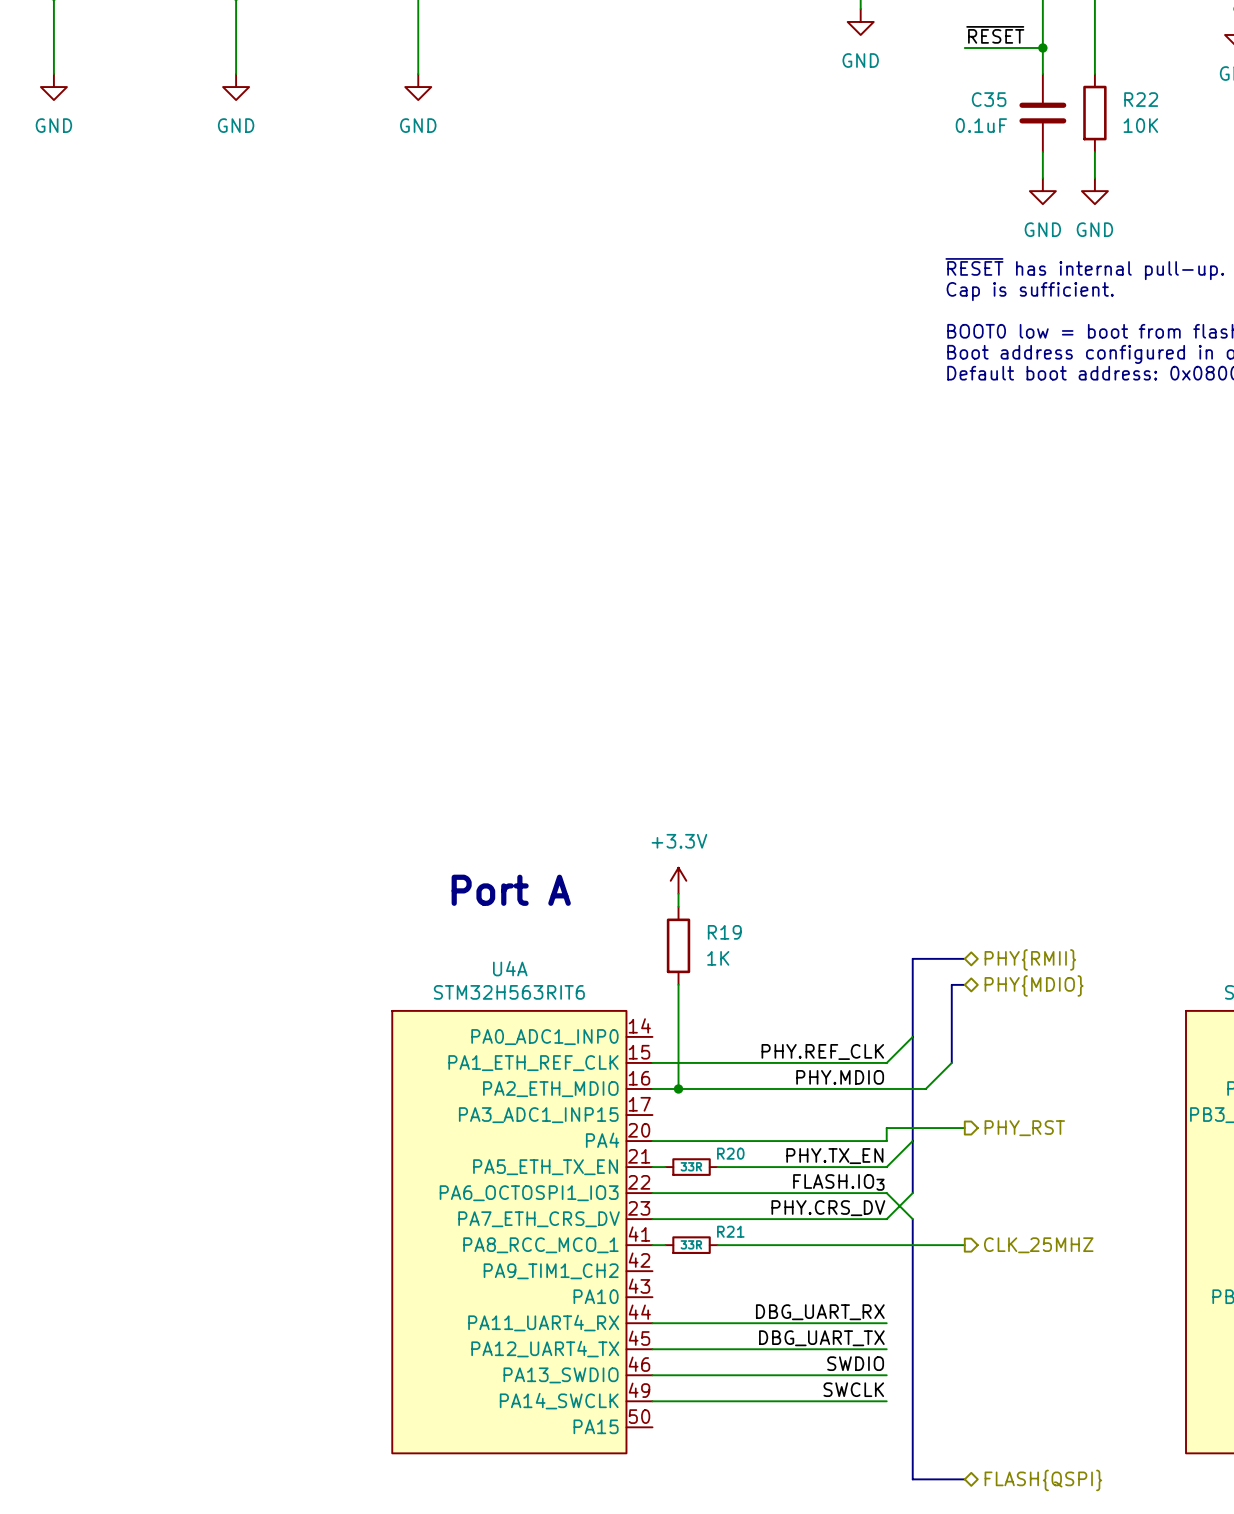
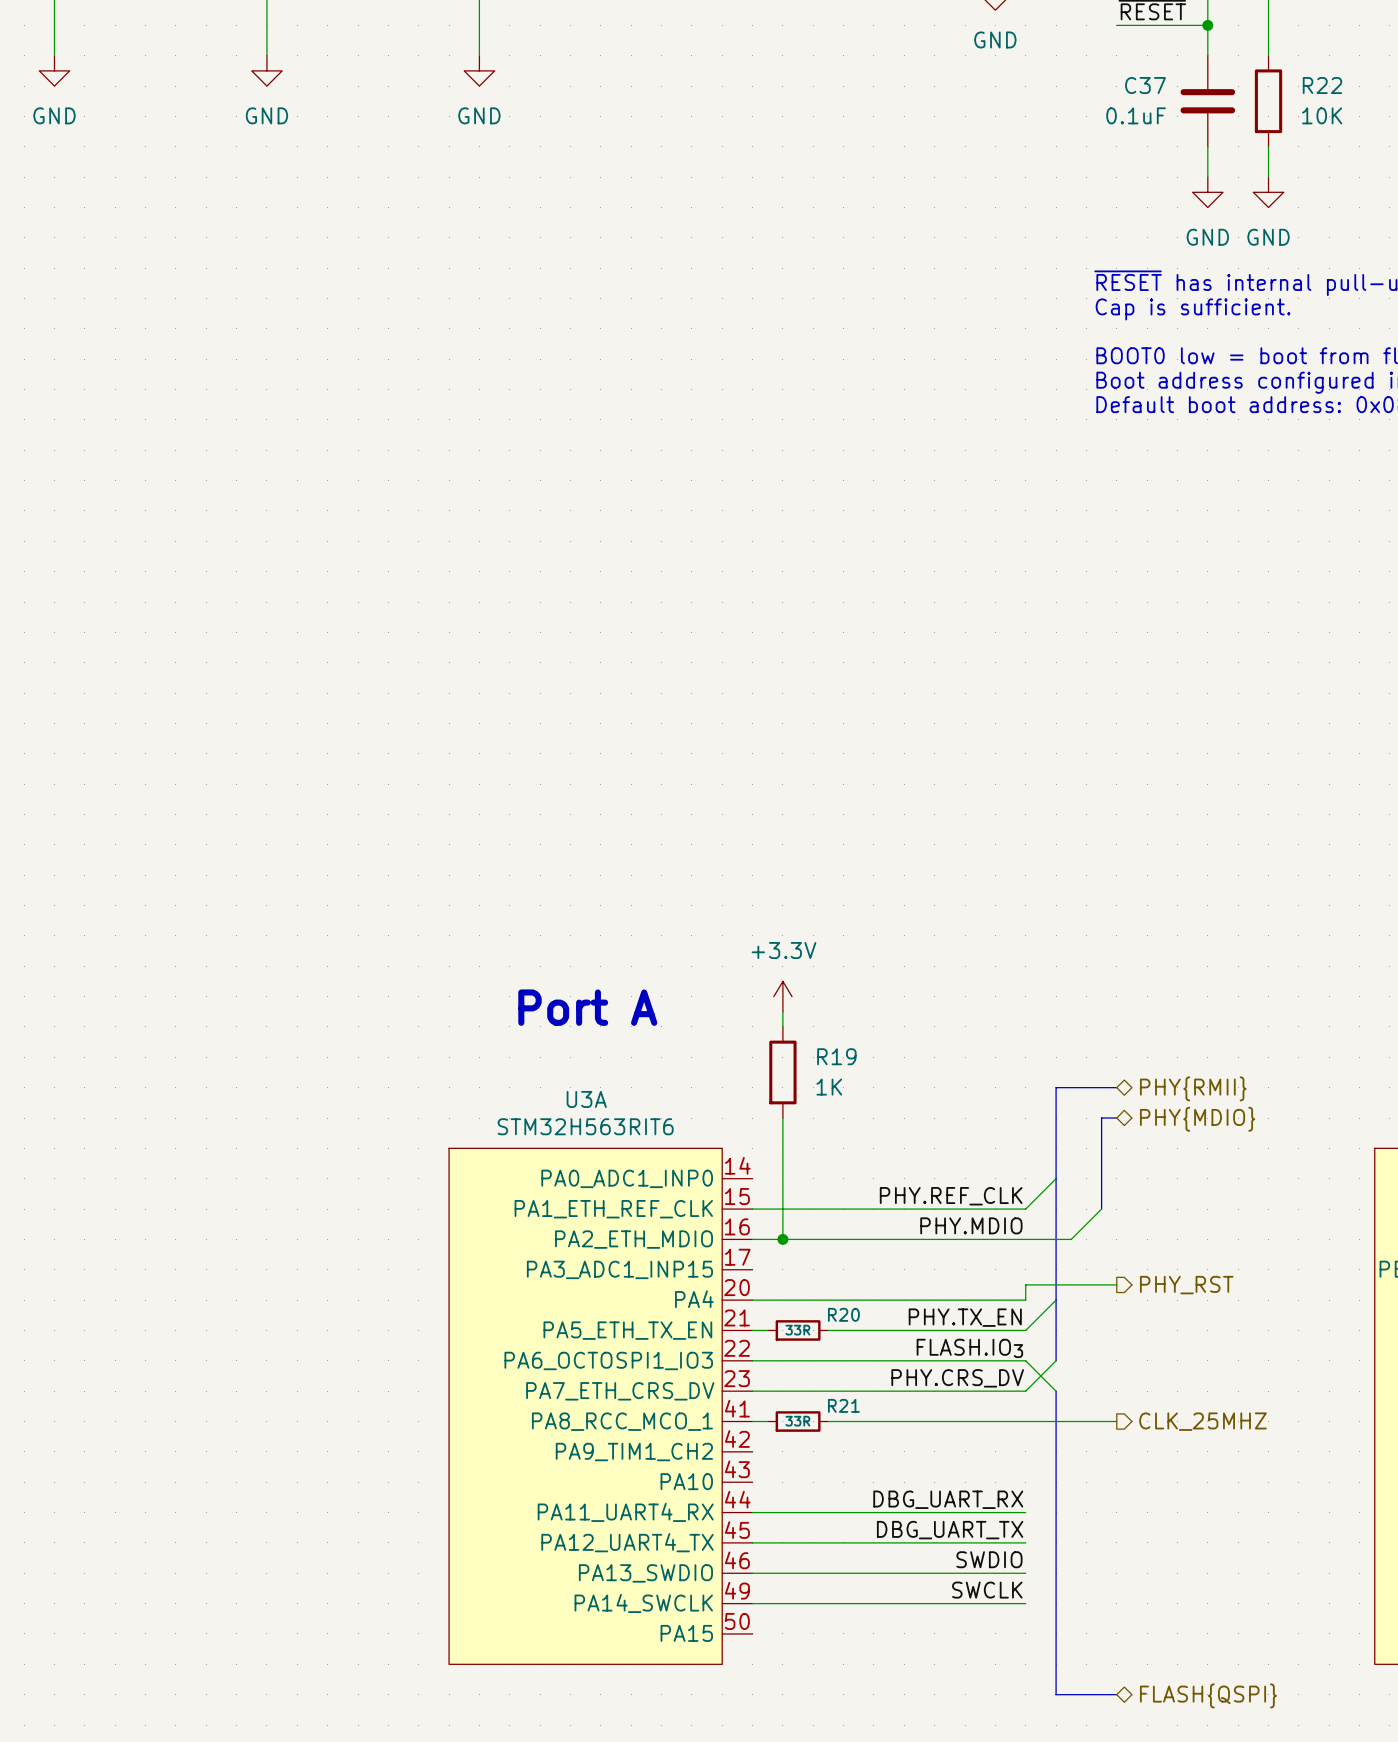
C35 name: C35 (989, 99) -> C37 (1145, 85)
U4A name: U4A (510, 968) -> U3A (586, 1099)

